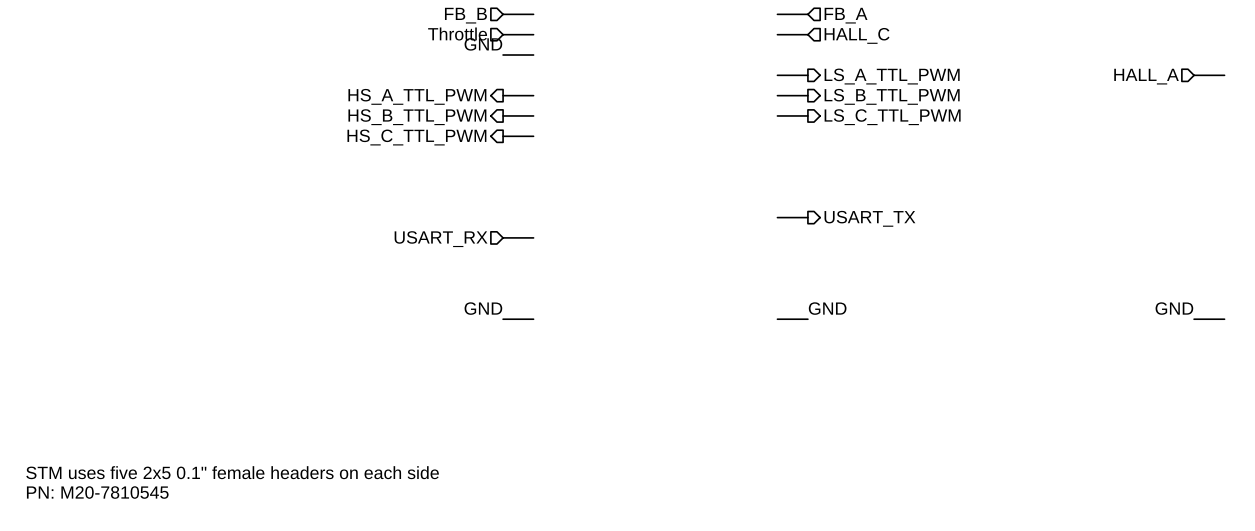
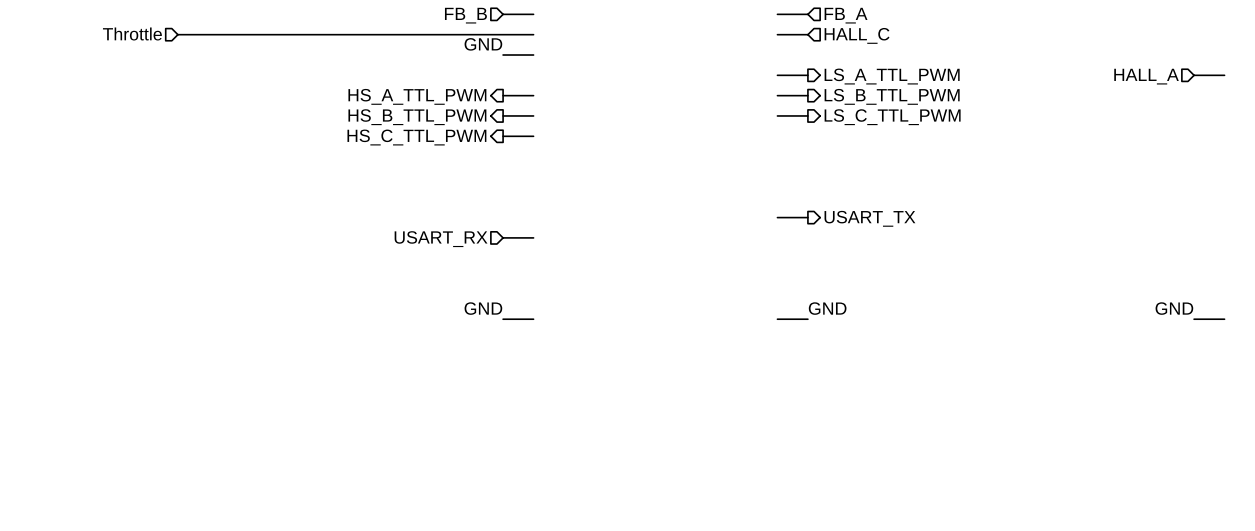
hierarchical label: none -> Throttle (132, 33)
hierarchical label: Throttle (457, 33) -> none
wire: none -> (177, 34) (503, 34)
text: STM uses five 2x5 0.1" female headers on each side (232, 472) -> none
text: PN: M20-7810545 (97, 492) -> none

